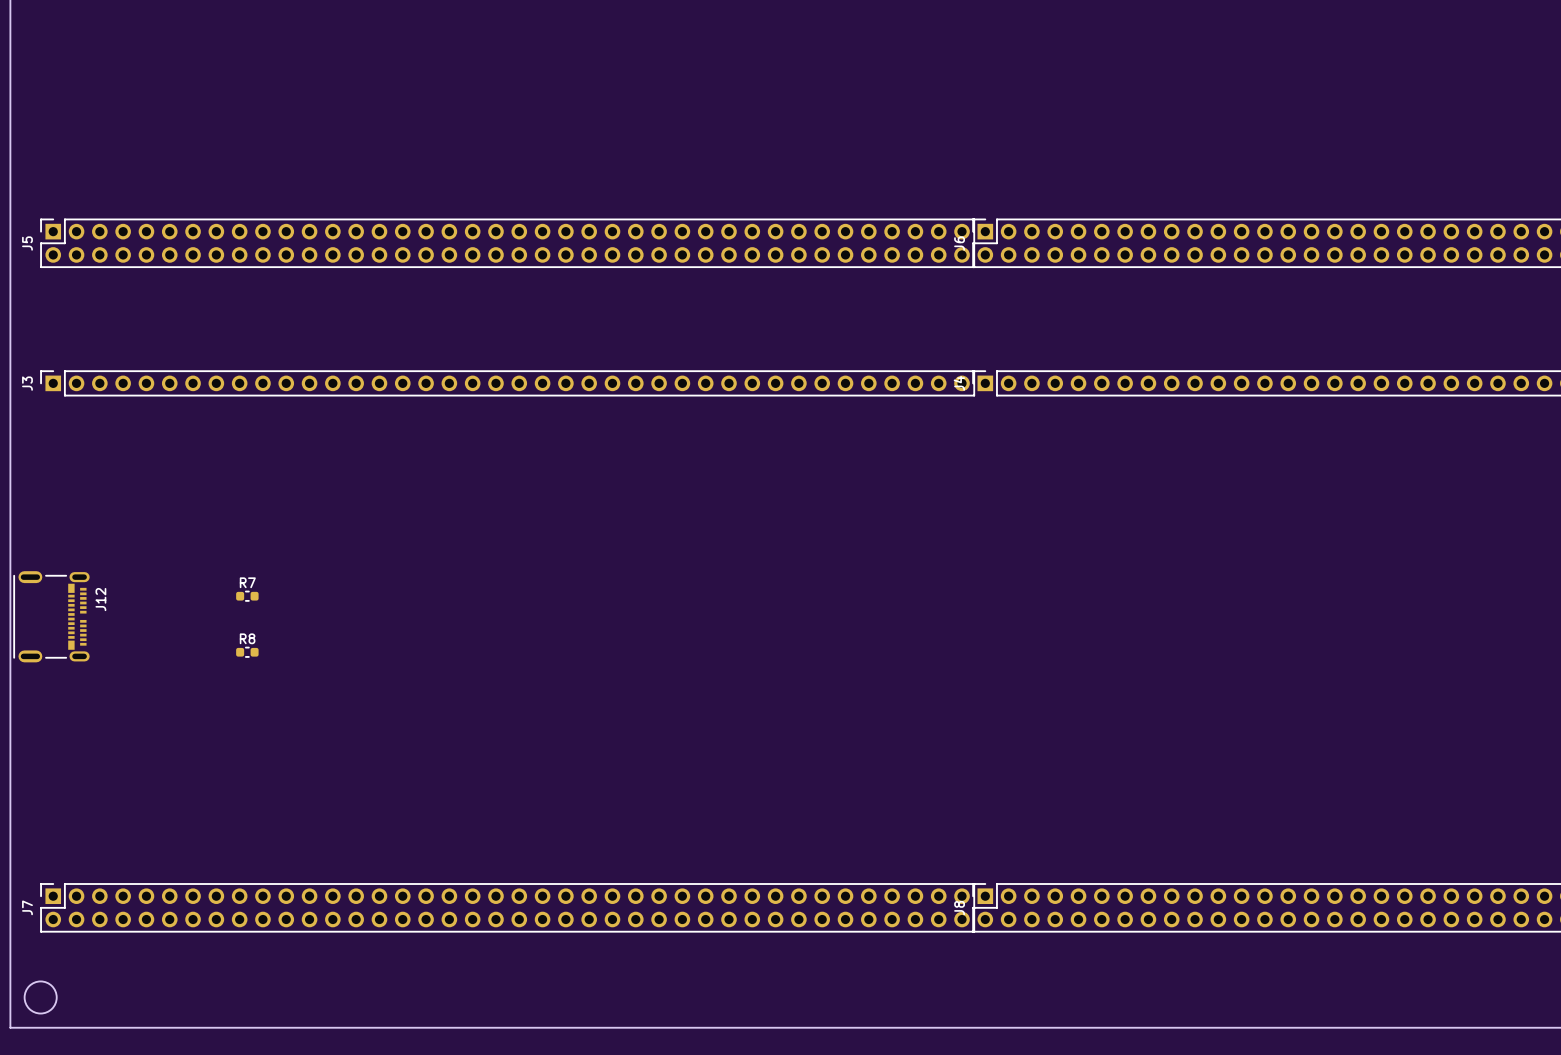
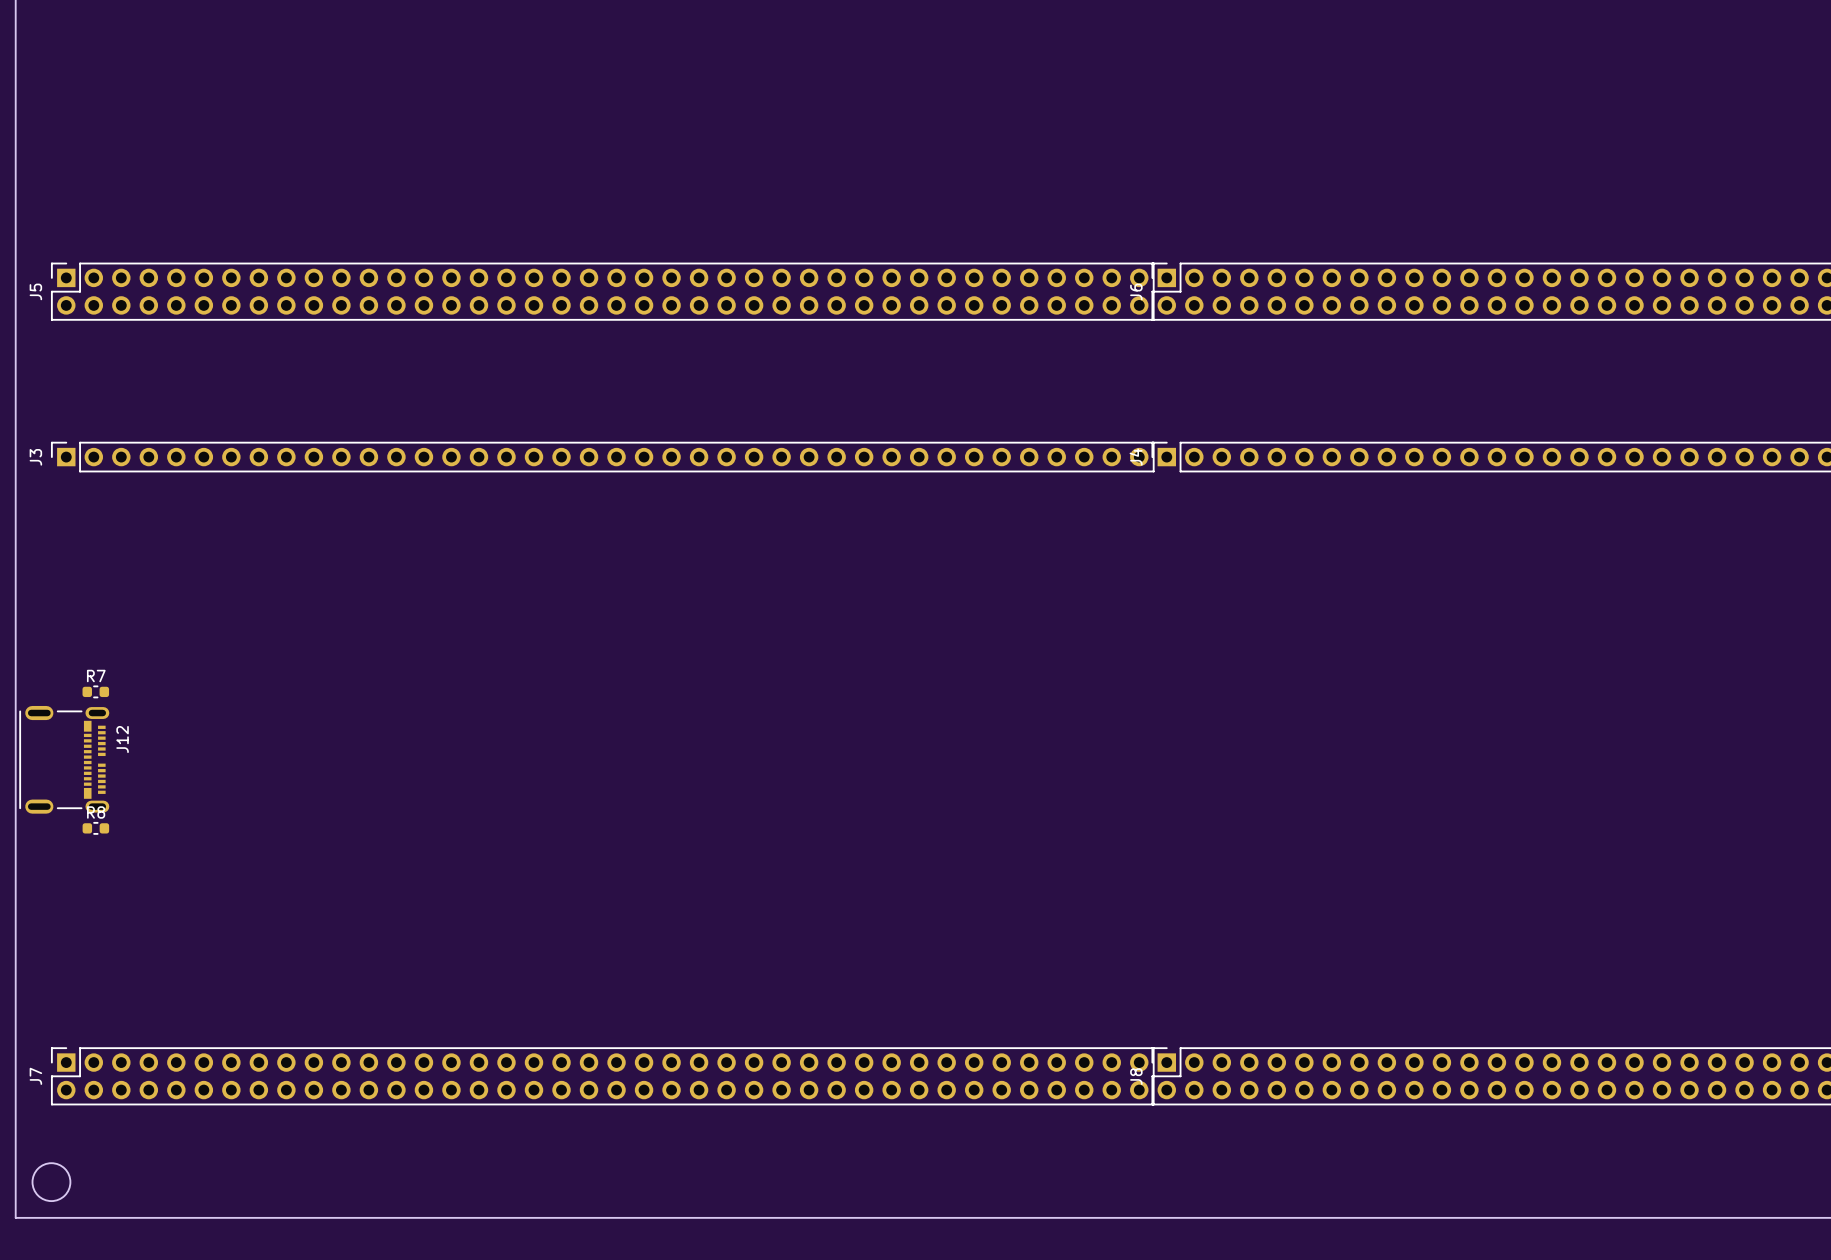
R7 position: (247, 596) -> (95, 691)
J12 position: (51, 616) -> (64, 759)
R8 position: (247, 652) -> (95, 828)

